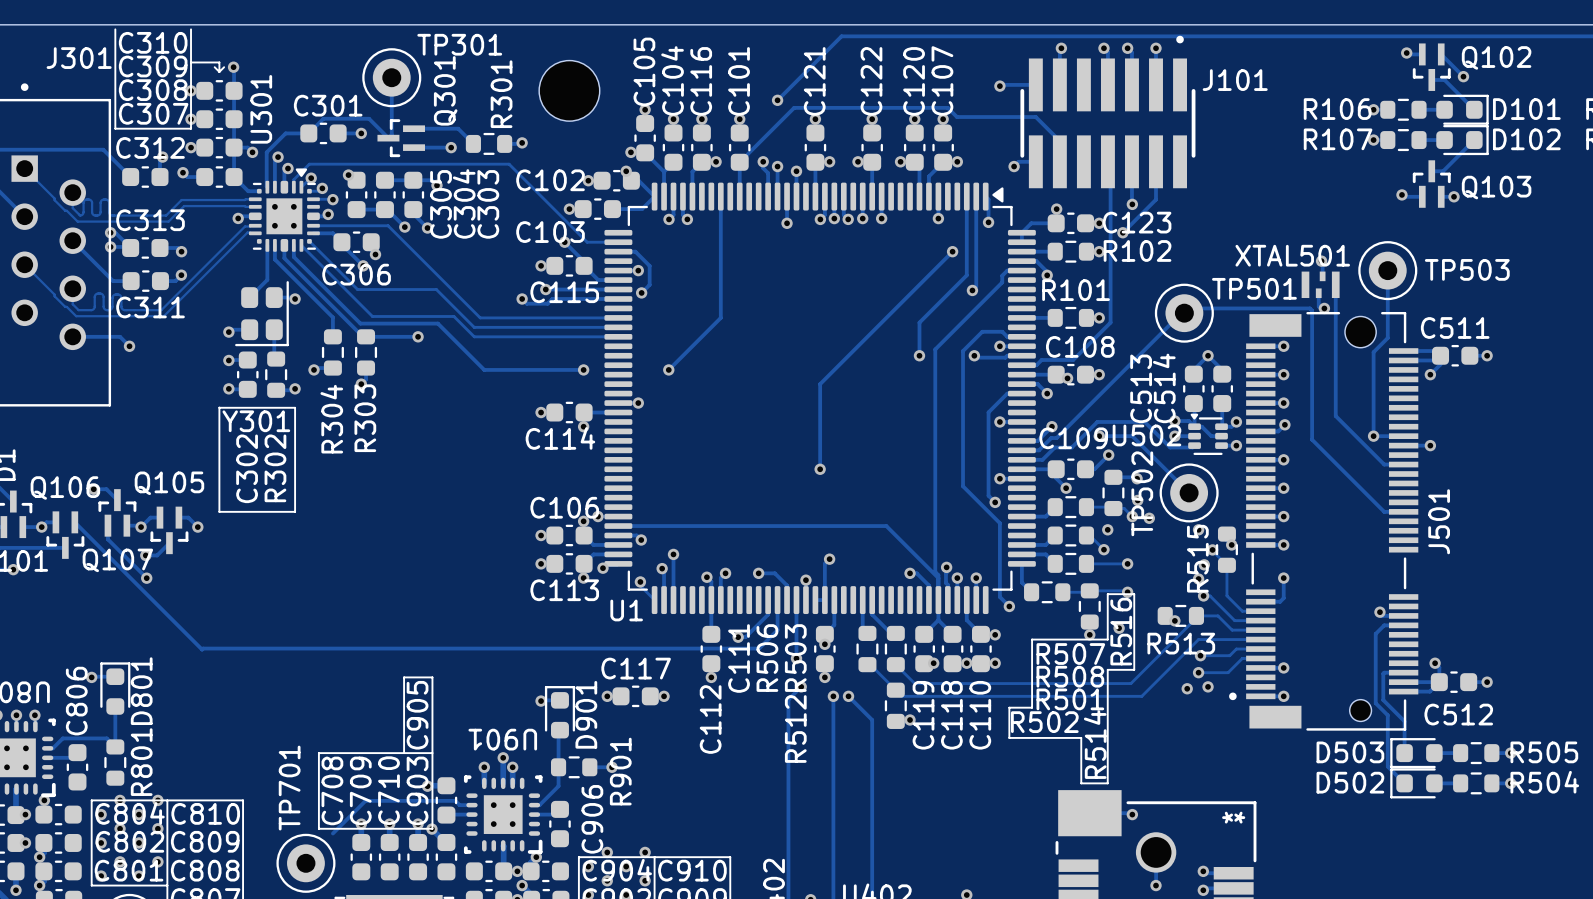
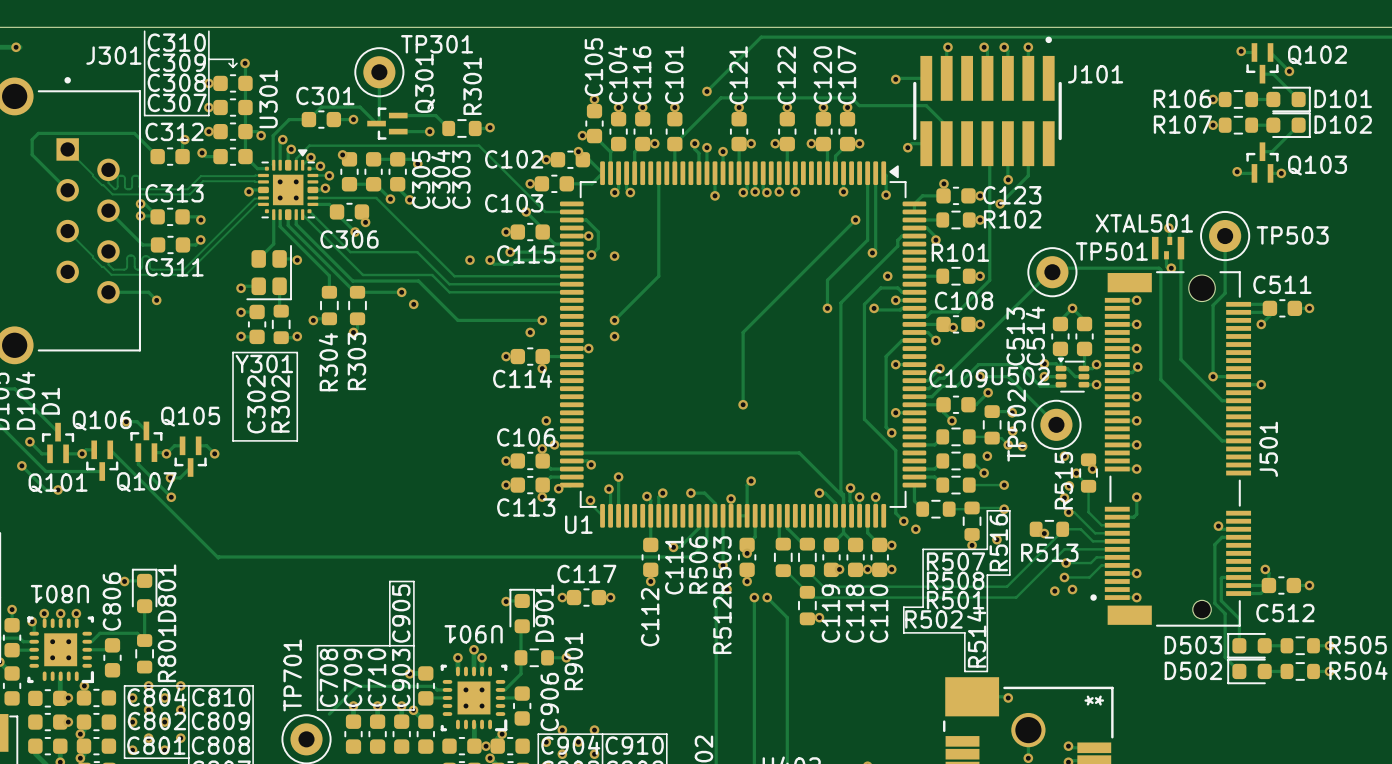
part: (569, 90) -> none
via: none -> (614, 256)
via: none -> (469, 260)
via: none -> (887, 276)
via: none -> (413, 304)
via: none -> (530, 332)
via: none -> (614, 336)
via: none -> (546, 420)
via: none -> (915, 529)

